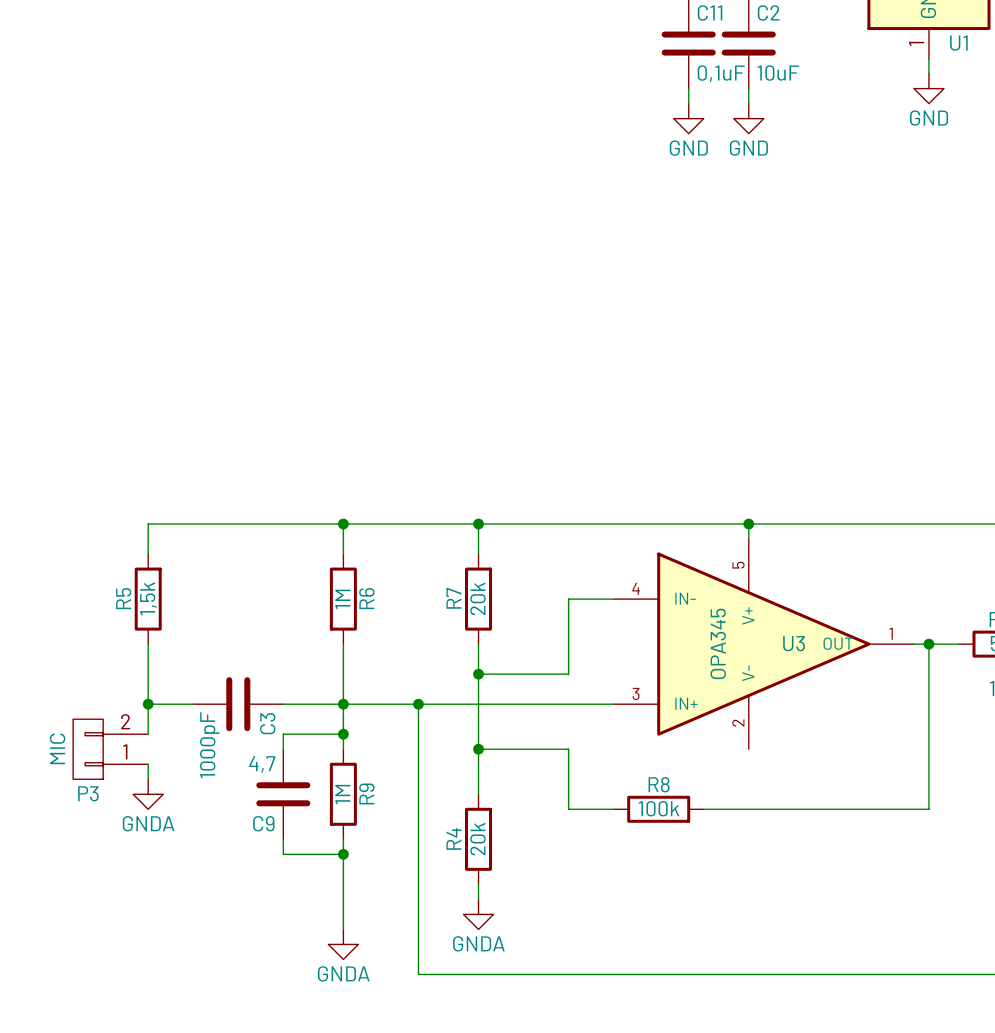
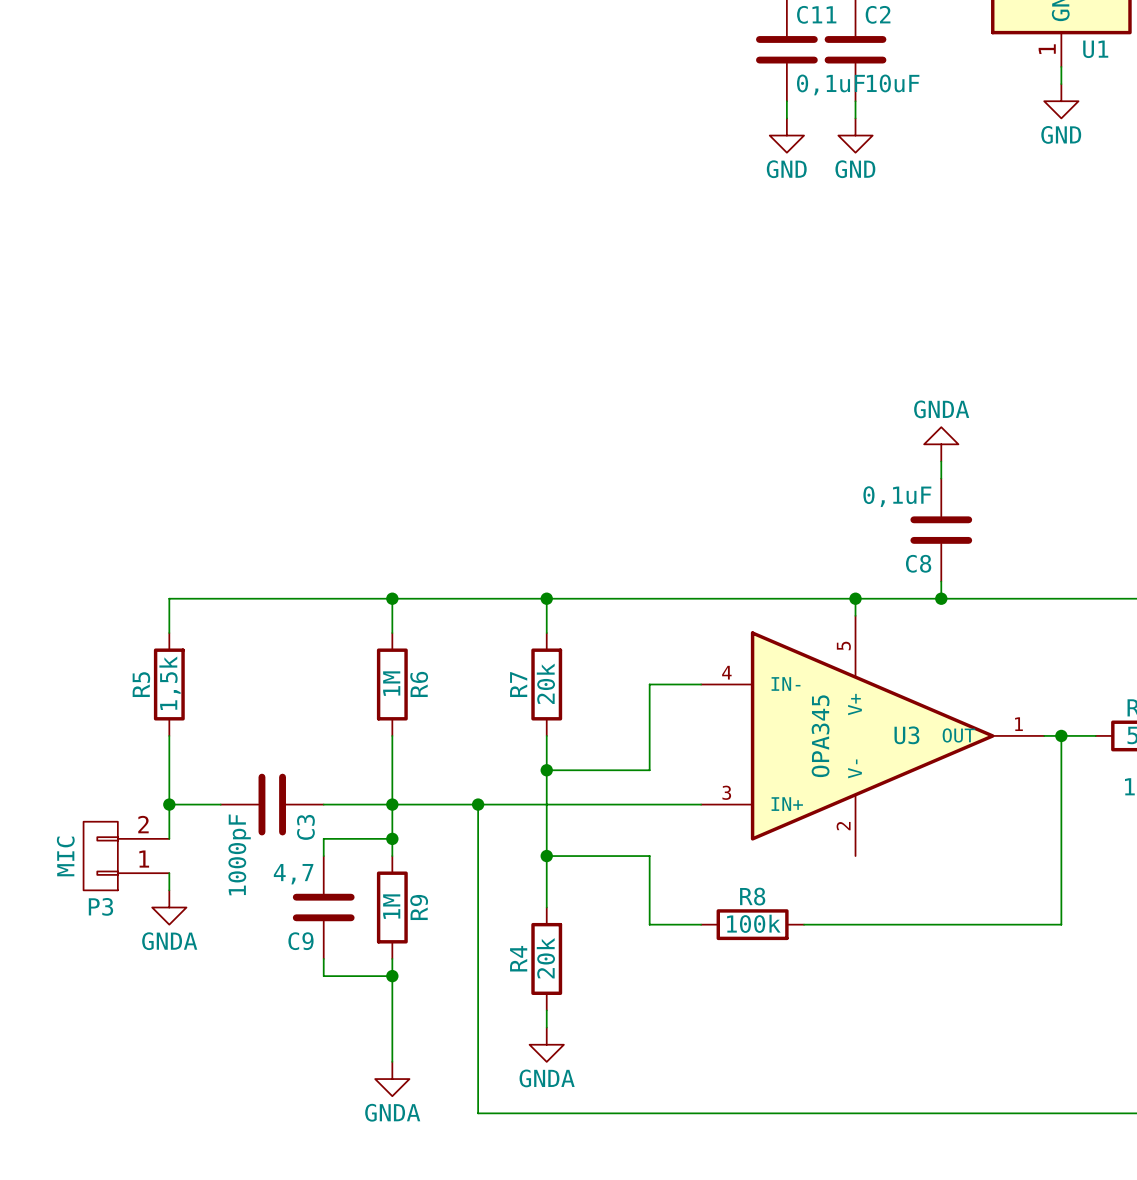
power symbol: none -> GNDA (941, 444)
wire: none -> (941, 461) (941, 478)
C8: none -> 0,1uF (941, 530)
wire: none -> (941, 581) (941, 598)
junction: none -> (941, 598)

